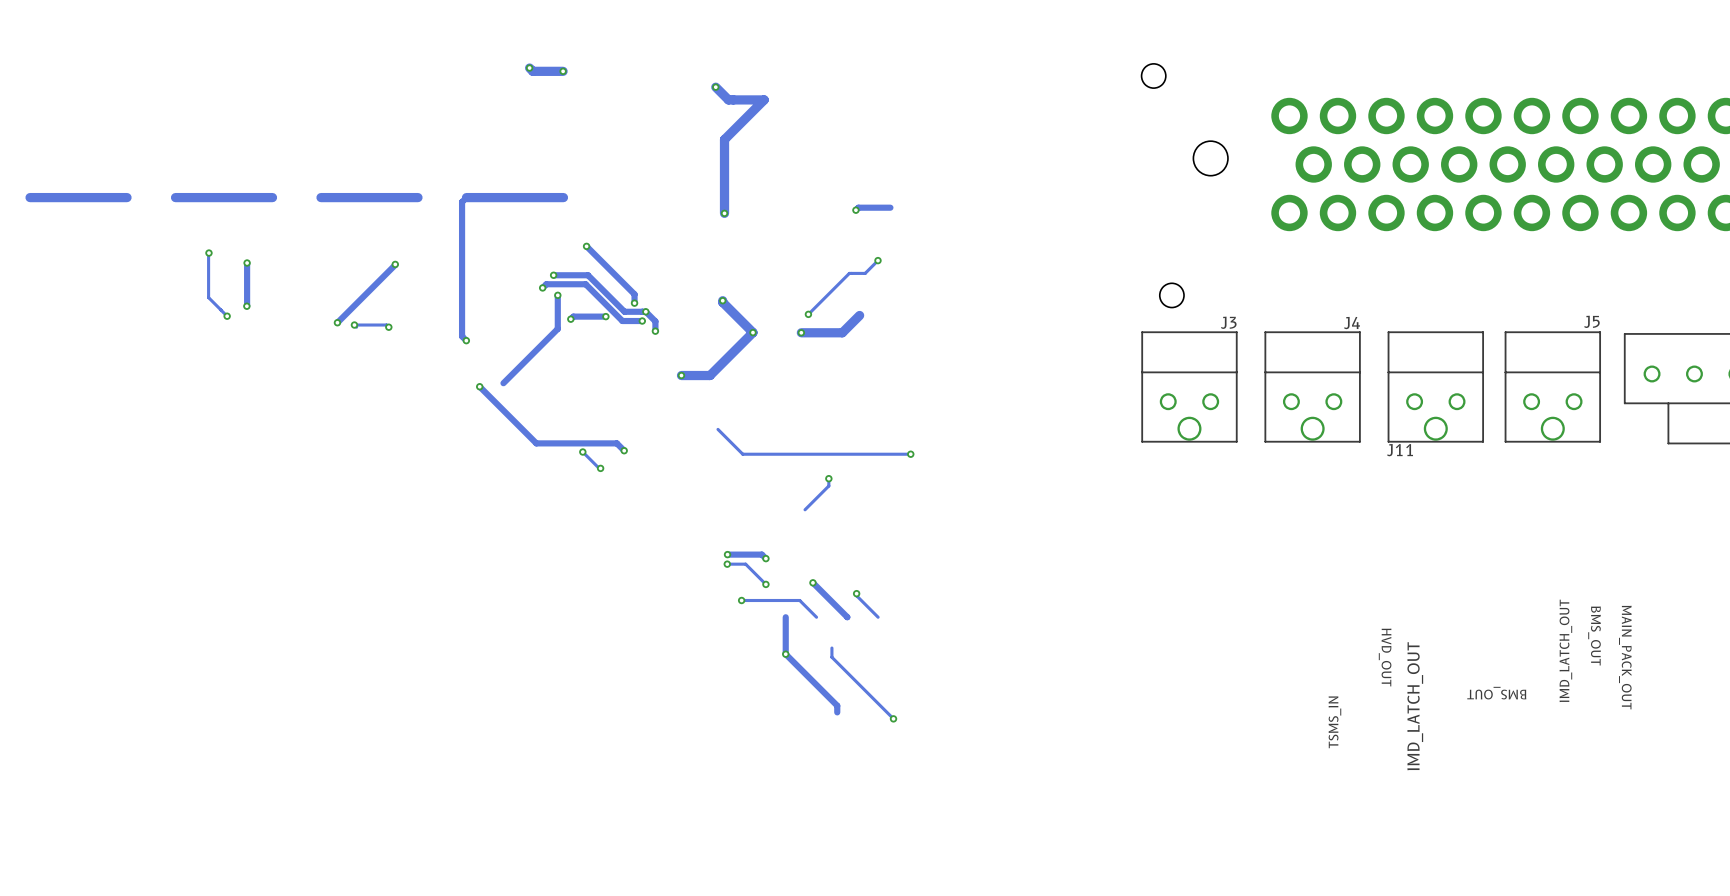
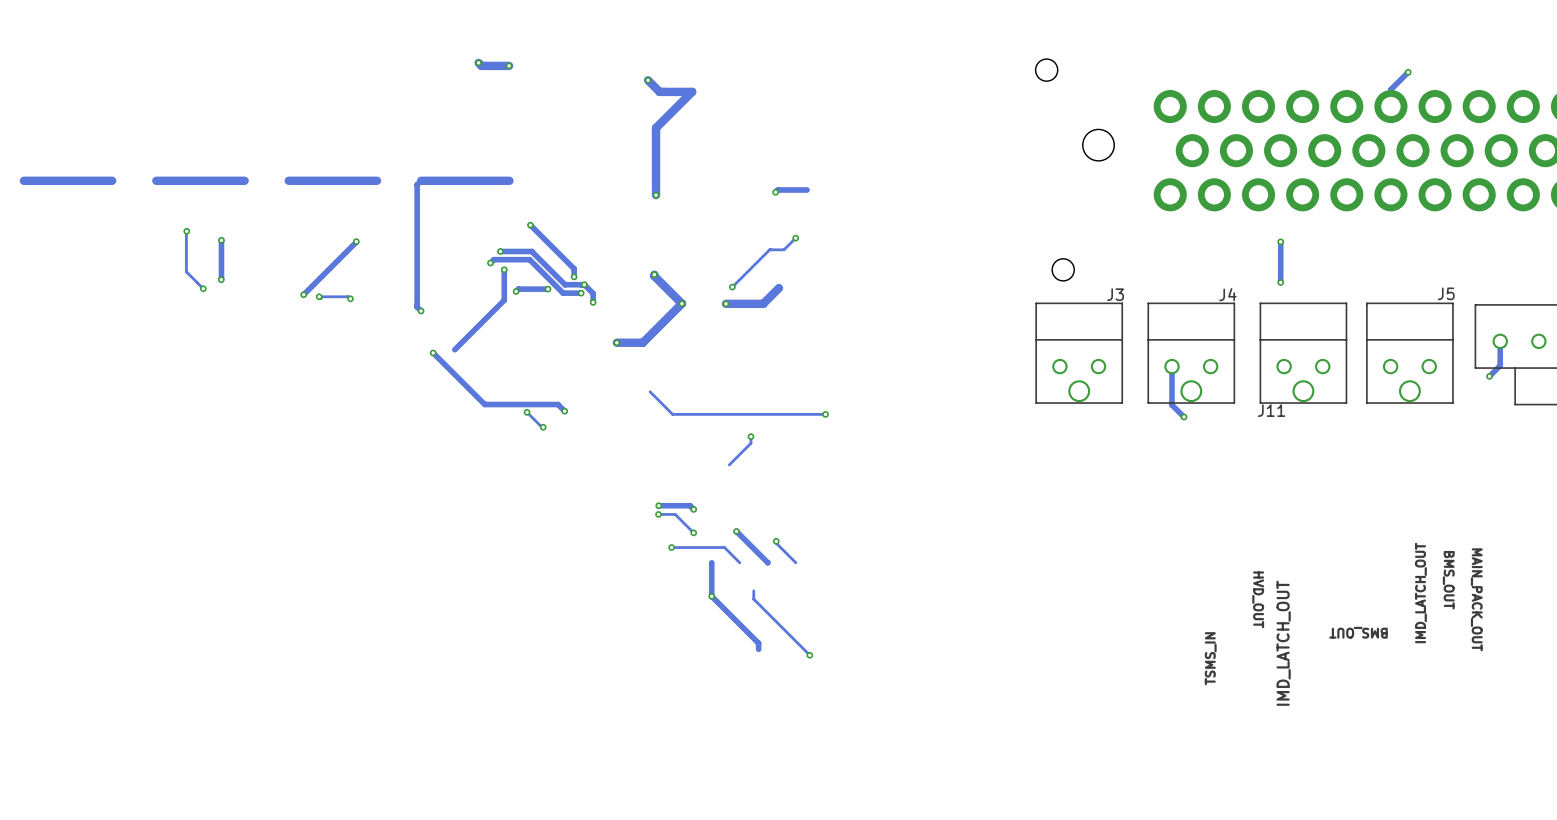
track: none -> (1408, 72) (1390, 89) (1390, 106)
via: none -> (1408, 72)
track: none -> (1280, 241) (1280, 282)
via: none -> (1280, 241)
via: none -> (1280, 282)
track: none -> (1500, 341) (1500, 365) (1489, 376)
track: none -> (1172, 366) (1172, 405) (1184, 417)
via: none -> (1489, 376)
via: none -> (1184, 417)

